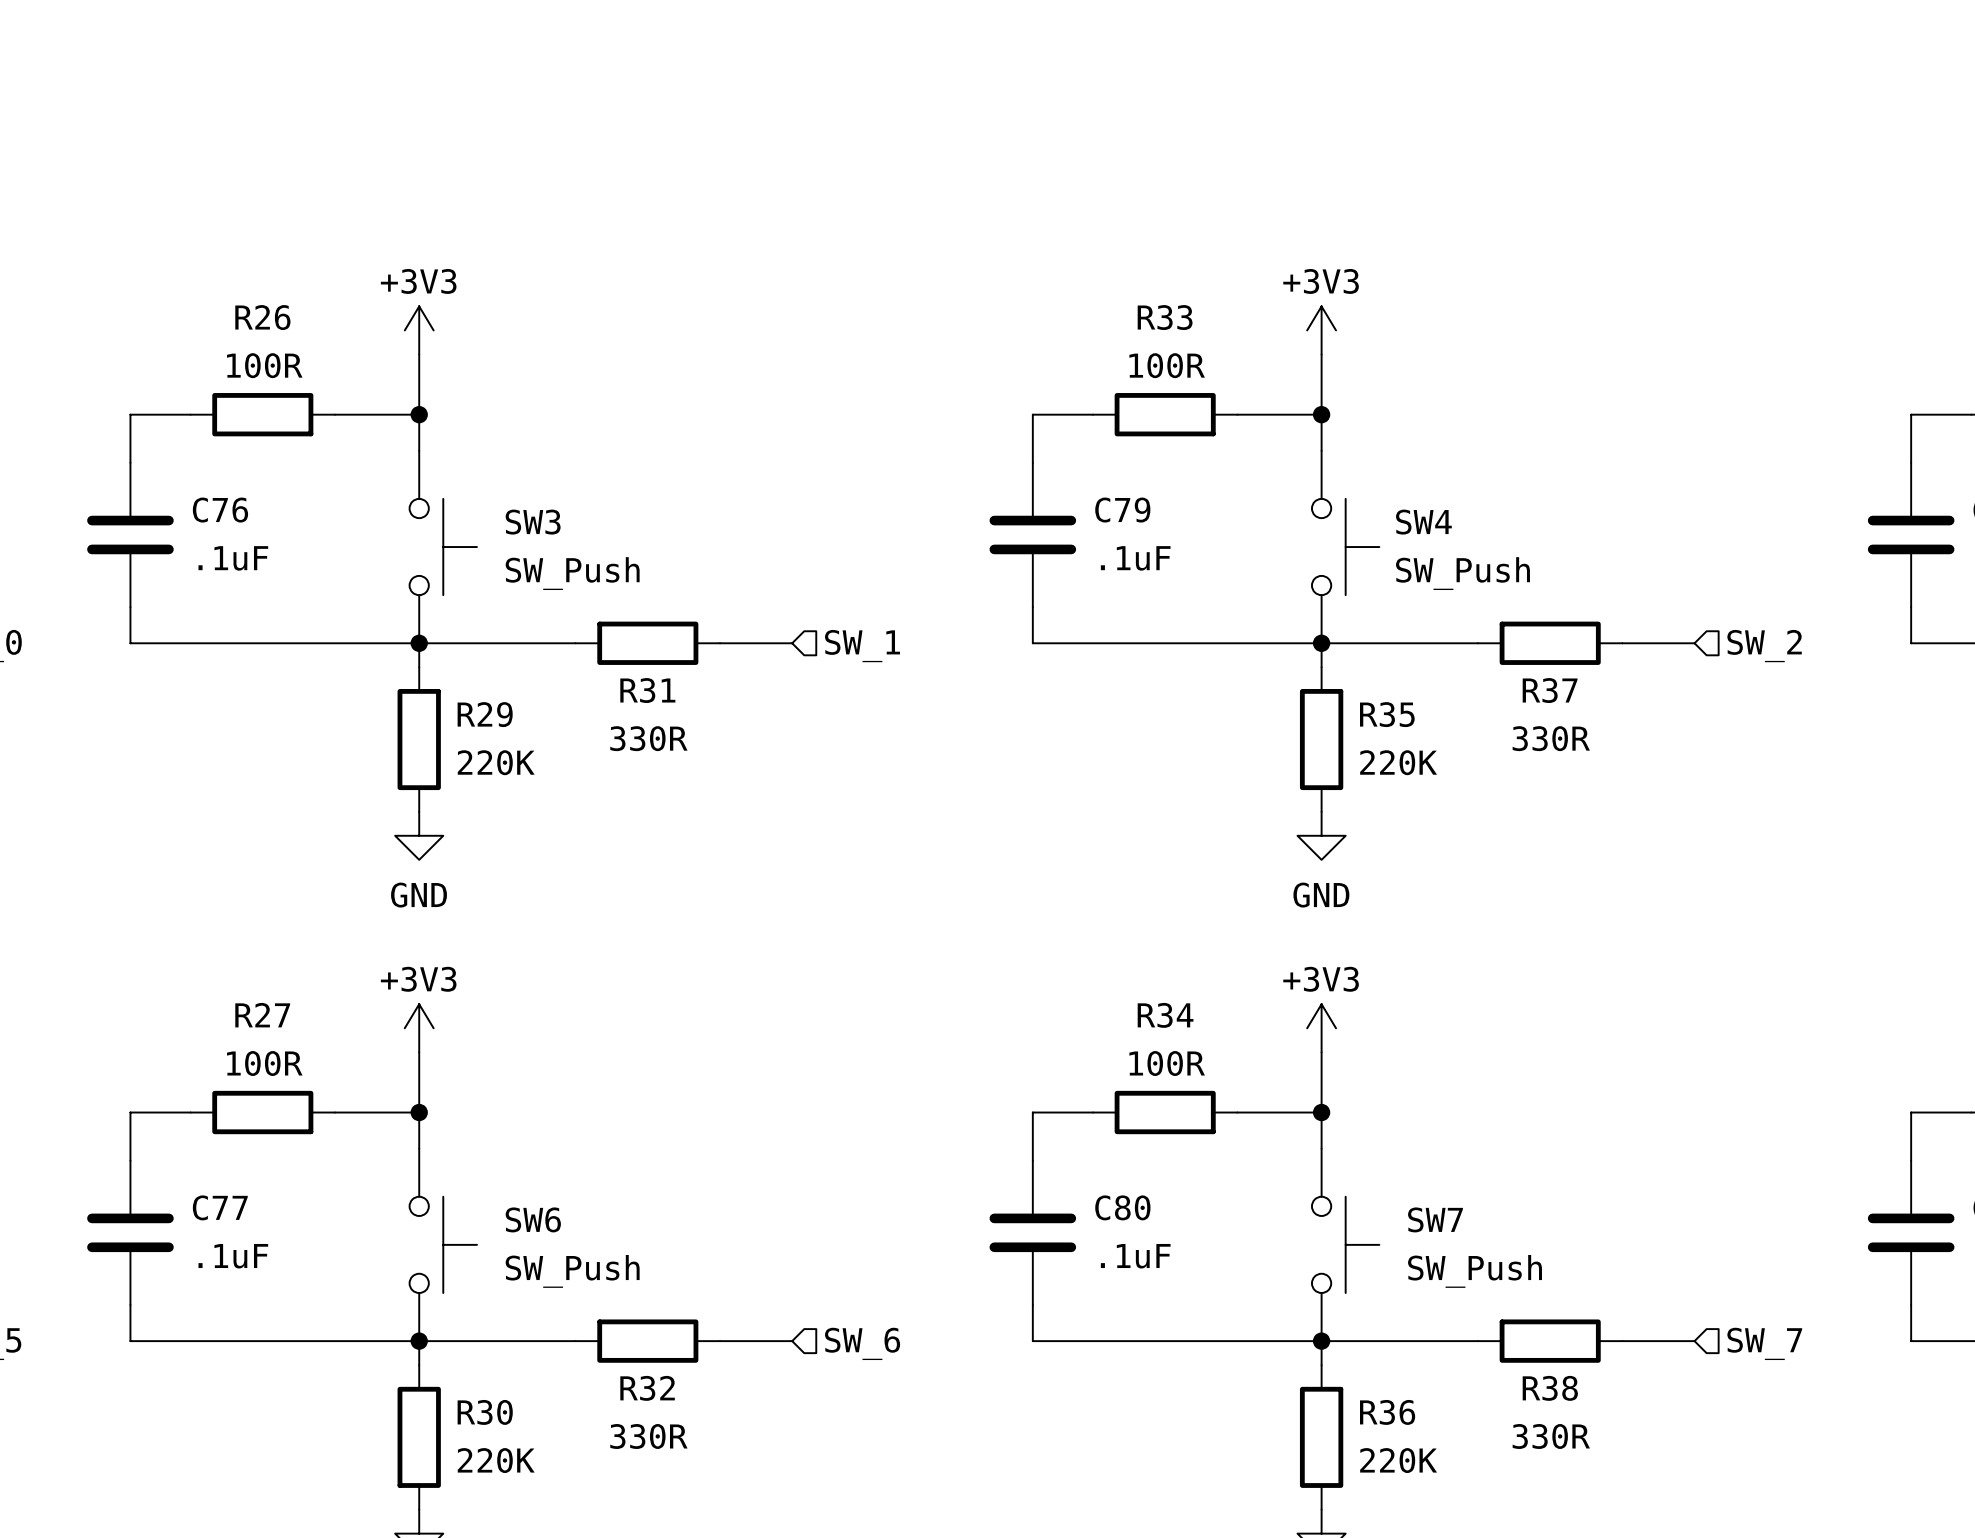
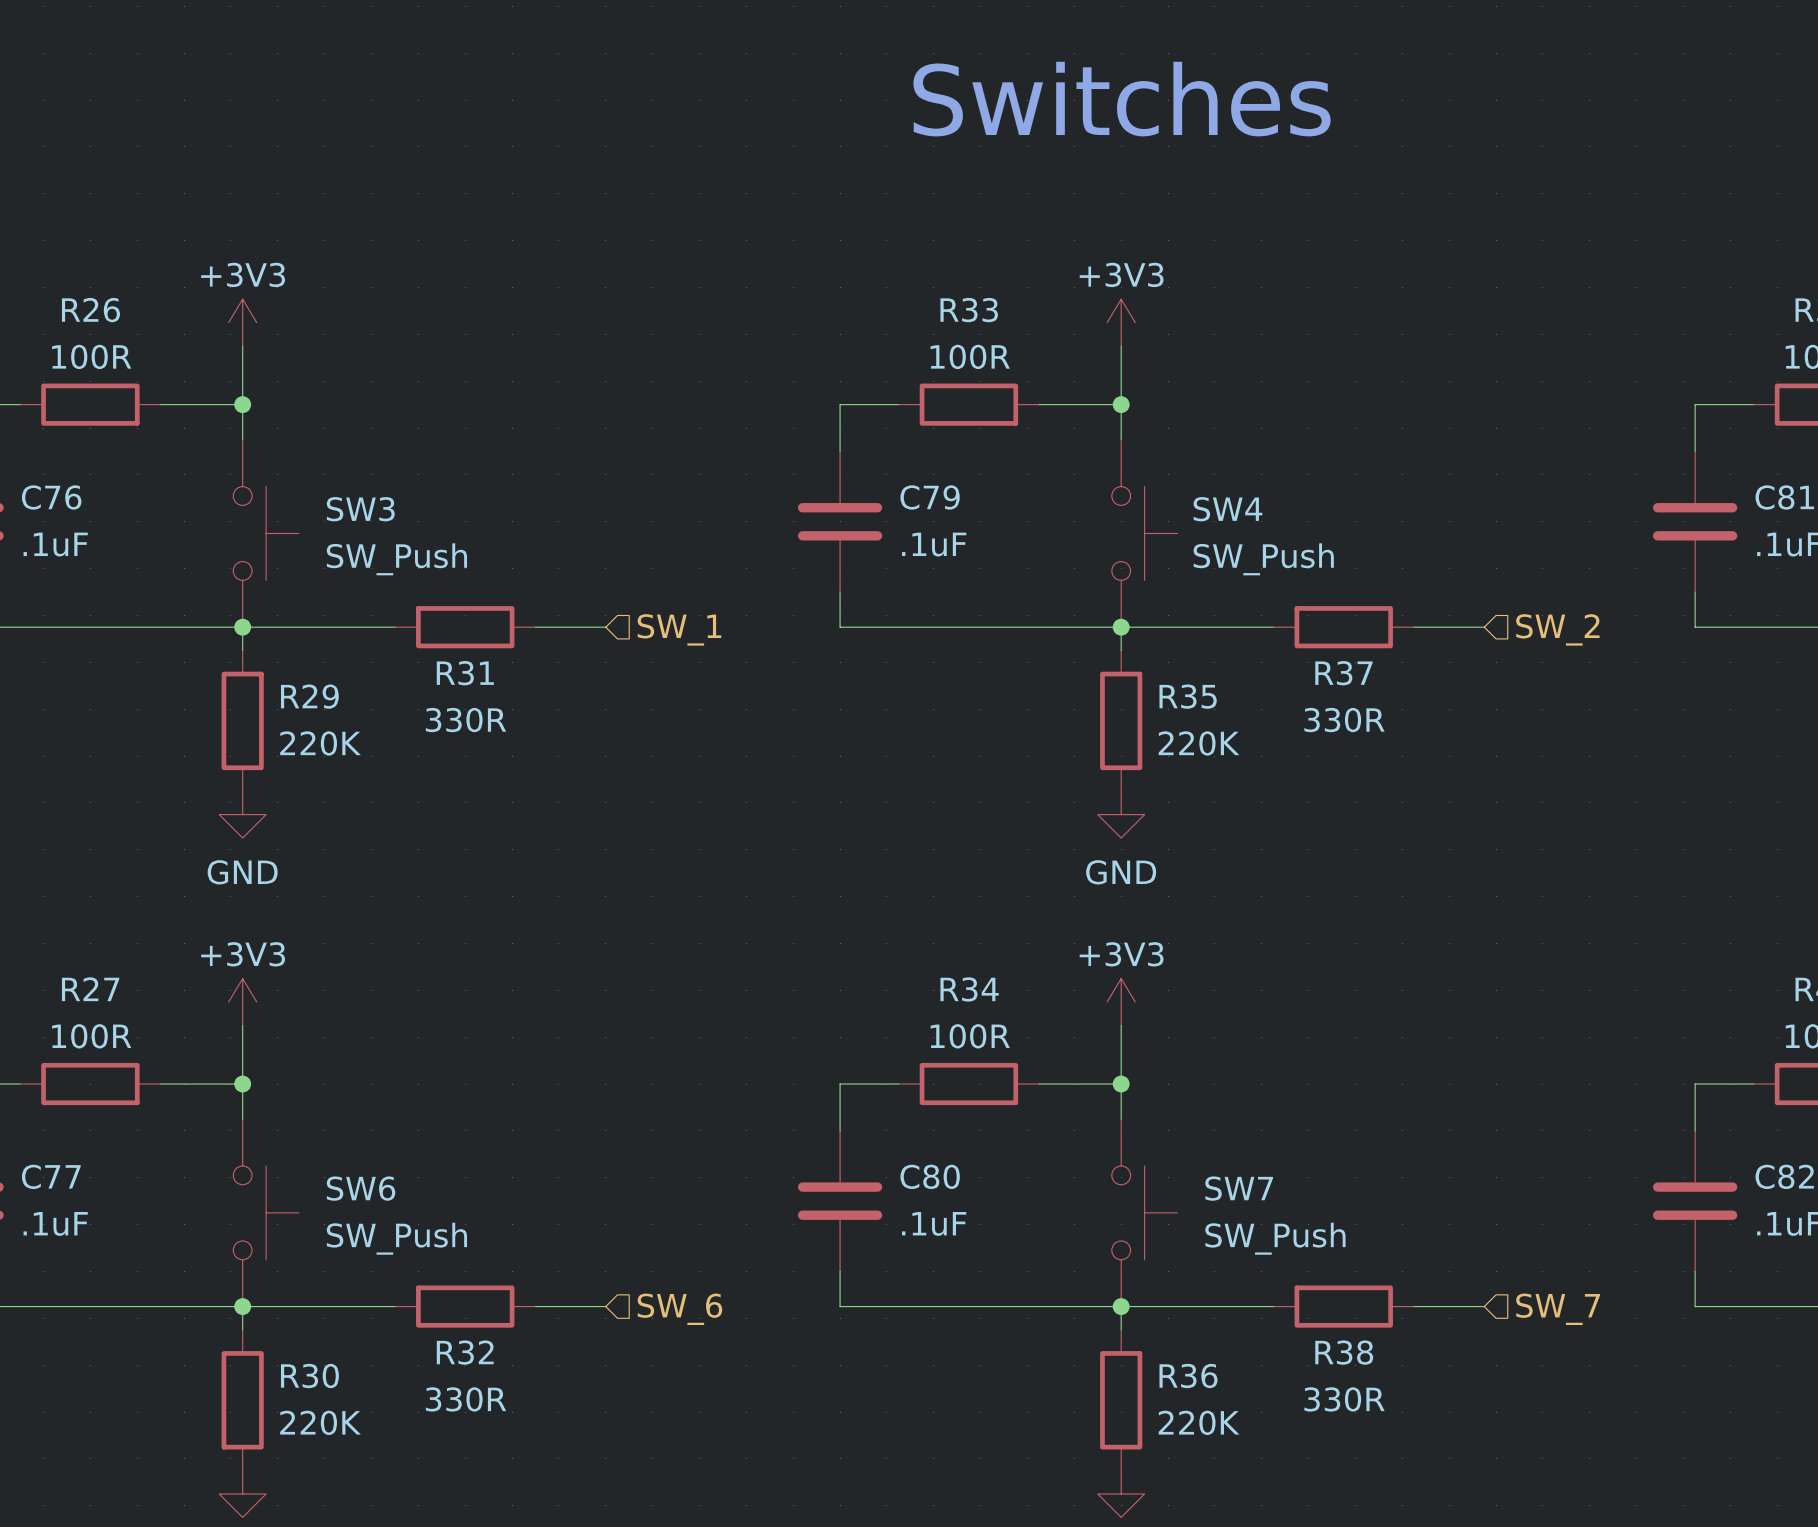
text: none -> Switches (1122, 99)

